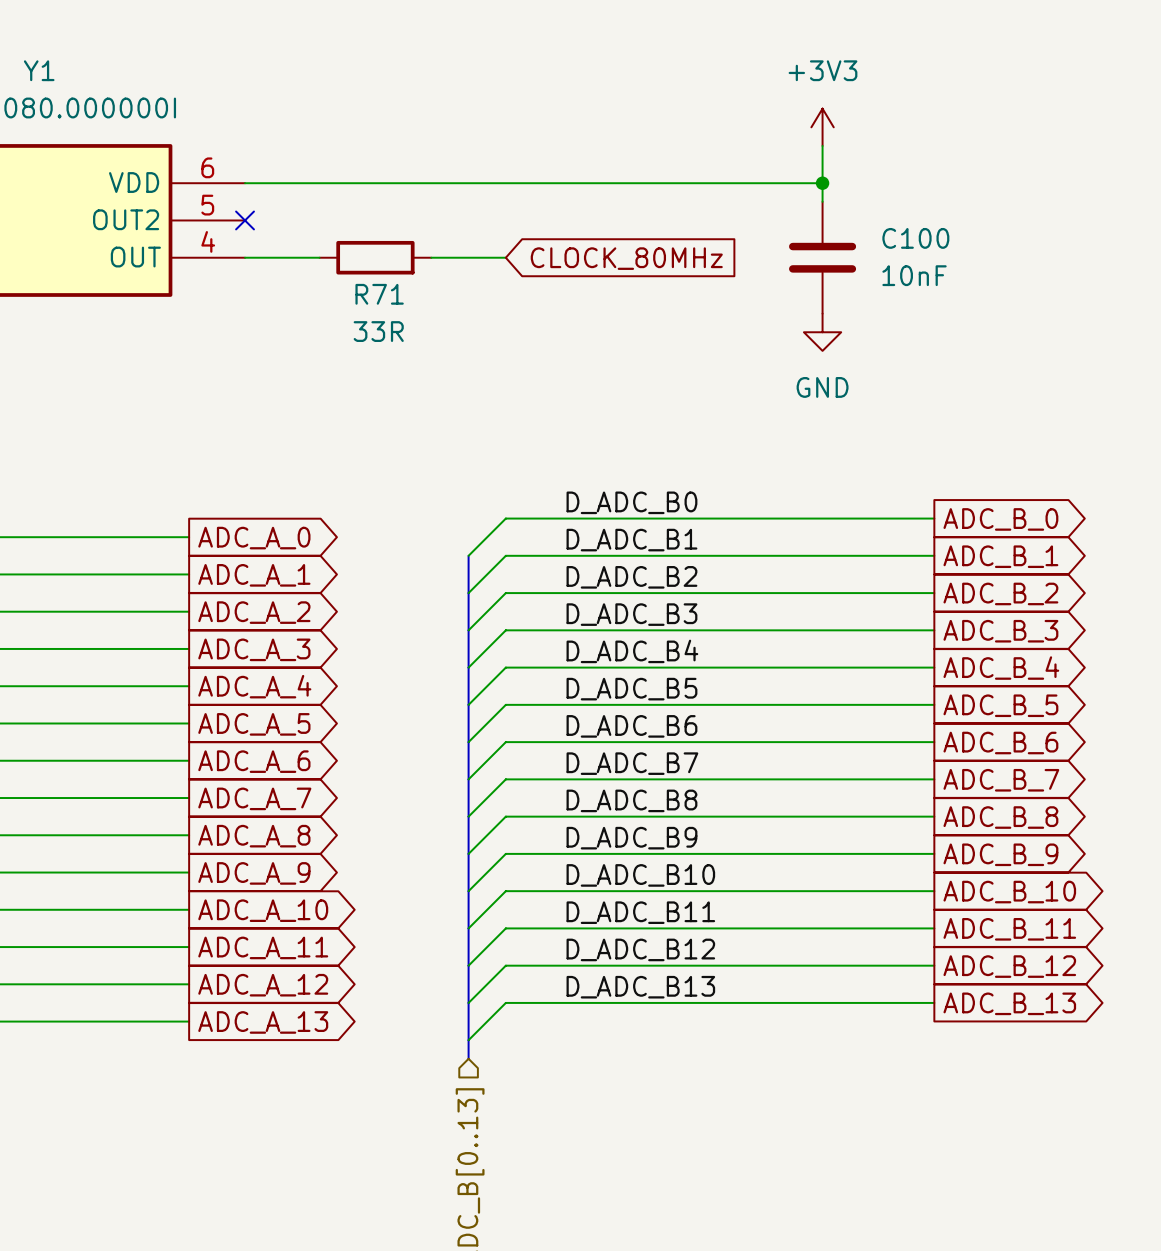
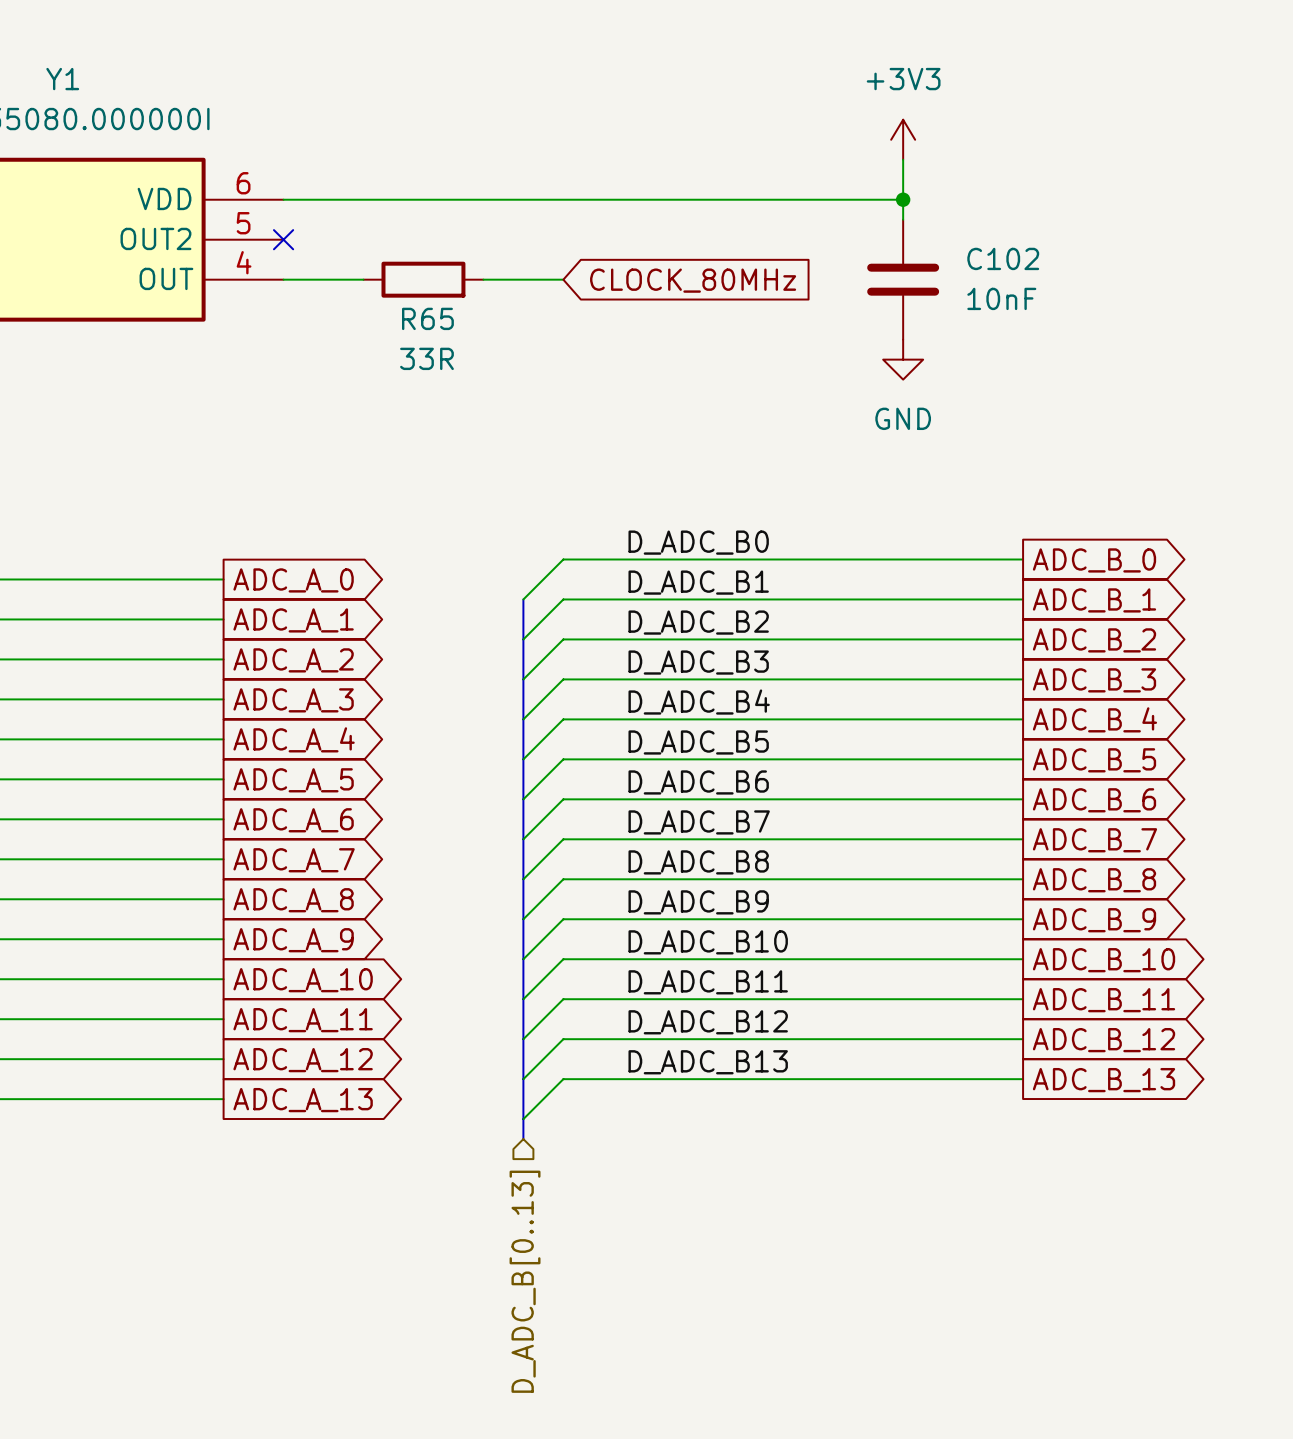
C100 name: C100 (915, 238) -> C102 (1003, 258)
R71 name: R71 (379, 294) -> R65 (427, 318)

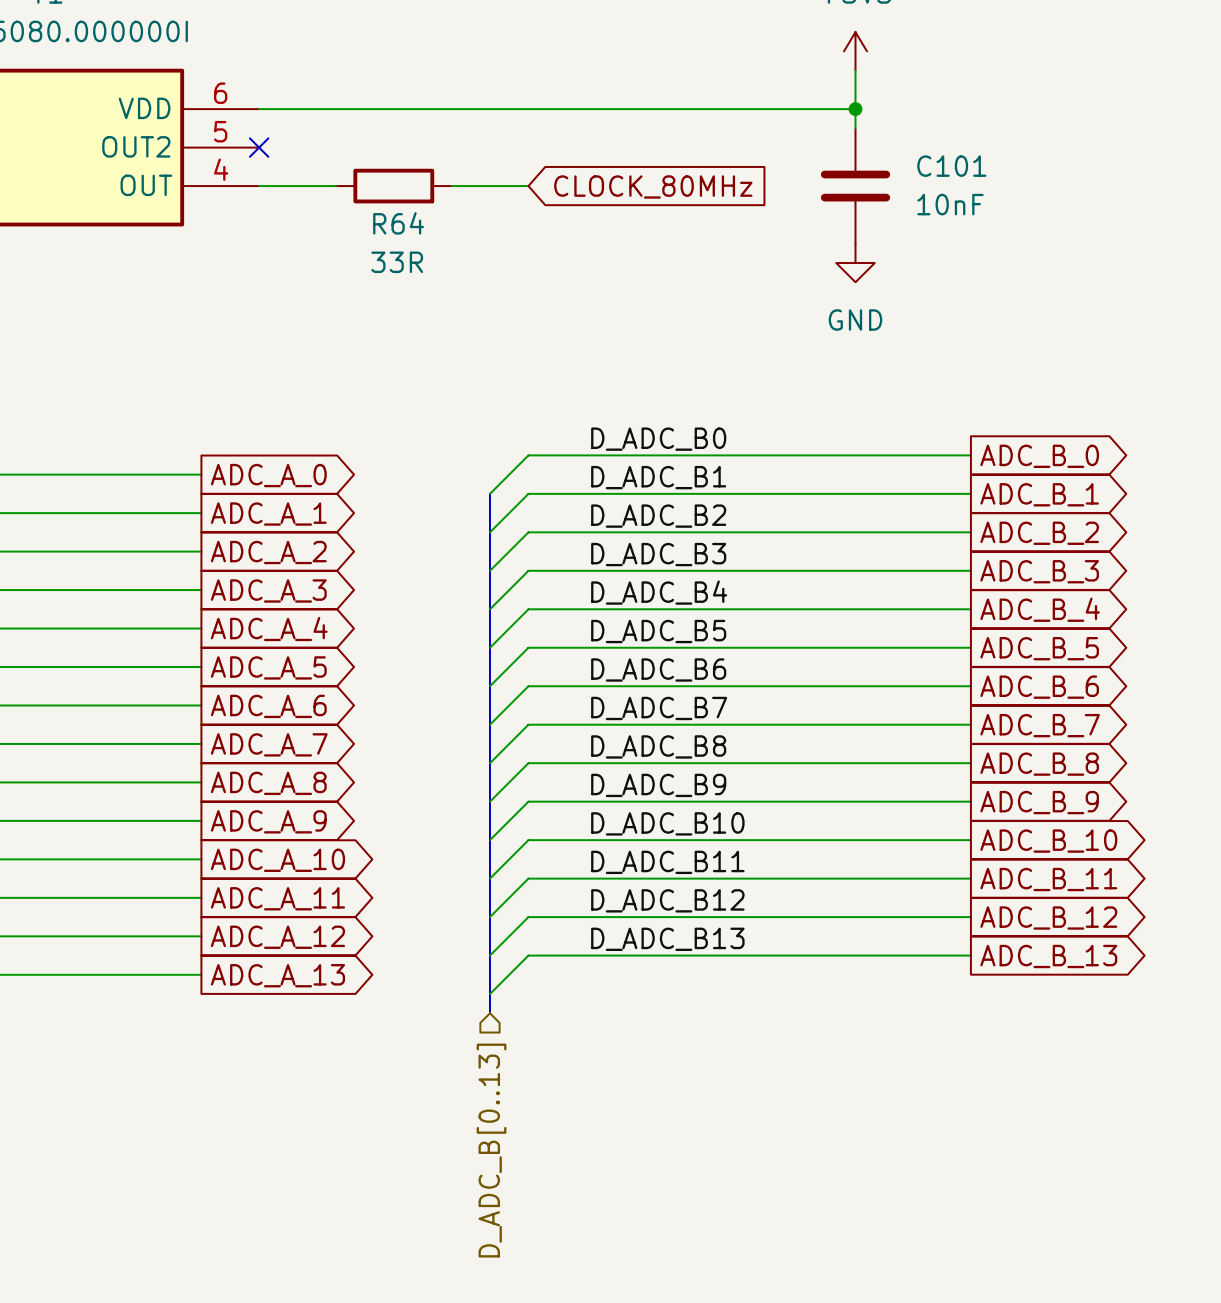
C102 name: C102 (1003, 258) -> C101 (951, 166)
R65 name: R65 (427, 318) -> R64 (398, 223)

